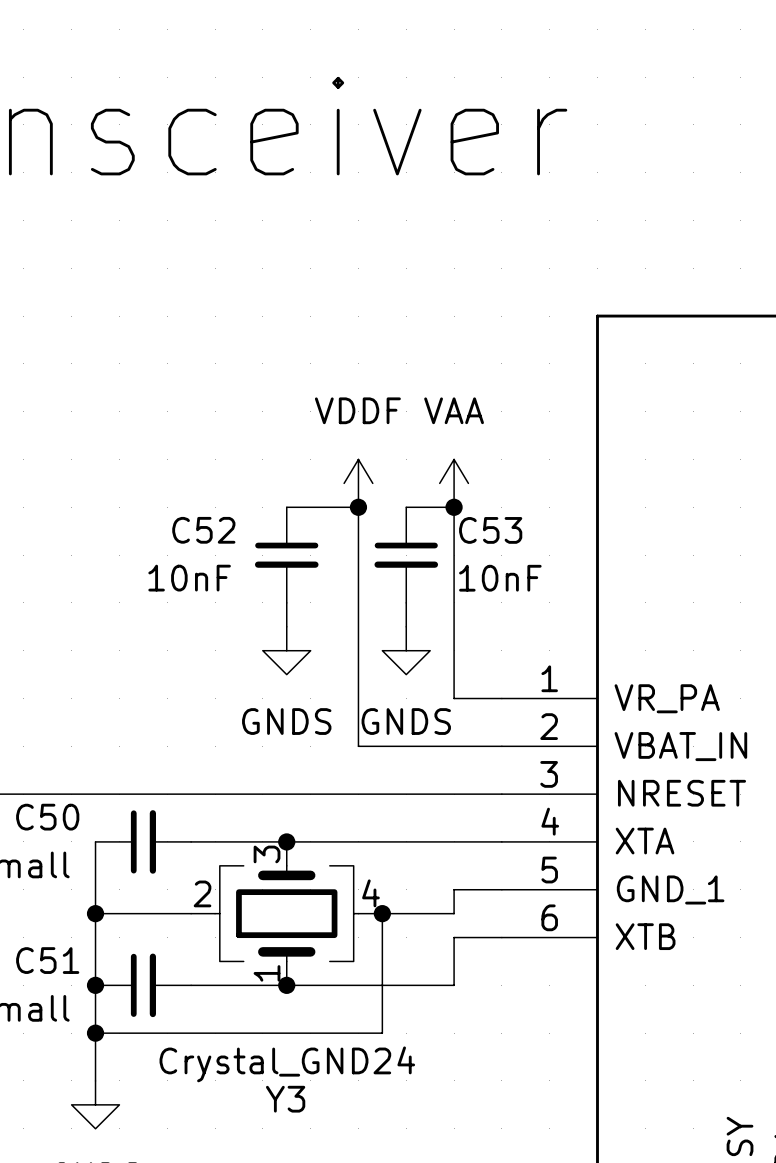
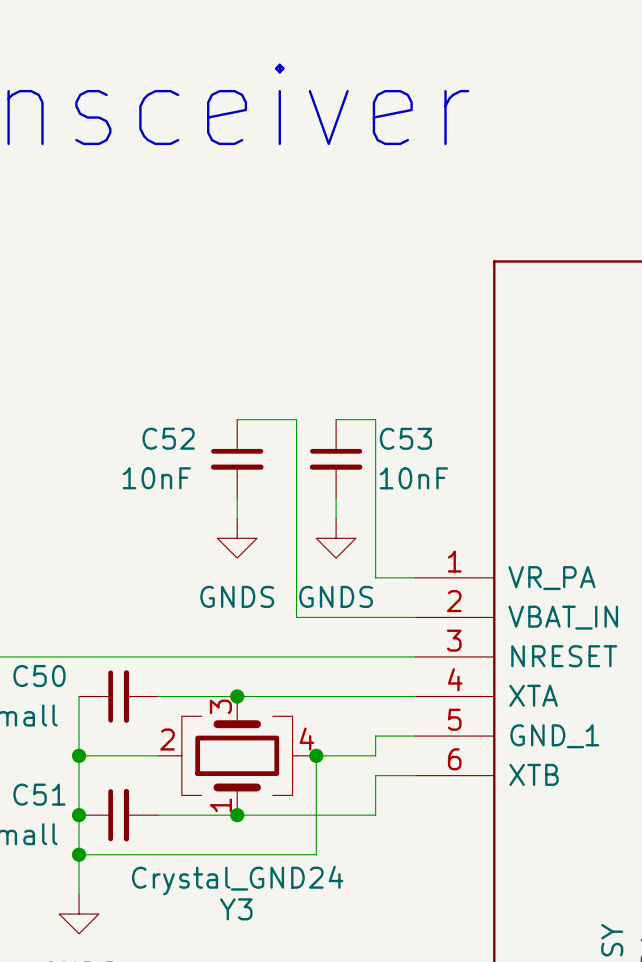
power symbol: VDDF (358, 483) -> none
power symbol: VAA (454, 483) -> none
junction: (358, 507) -> none
junction: (454, 507) -> none

